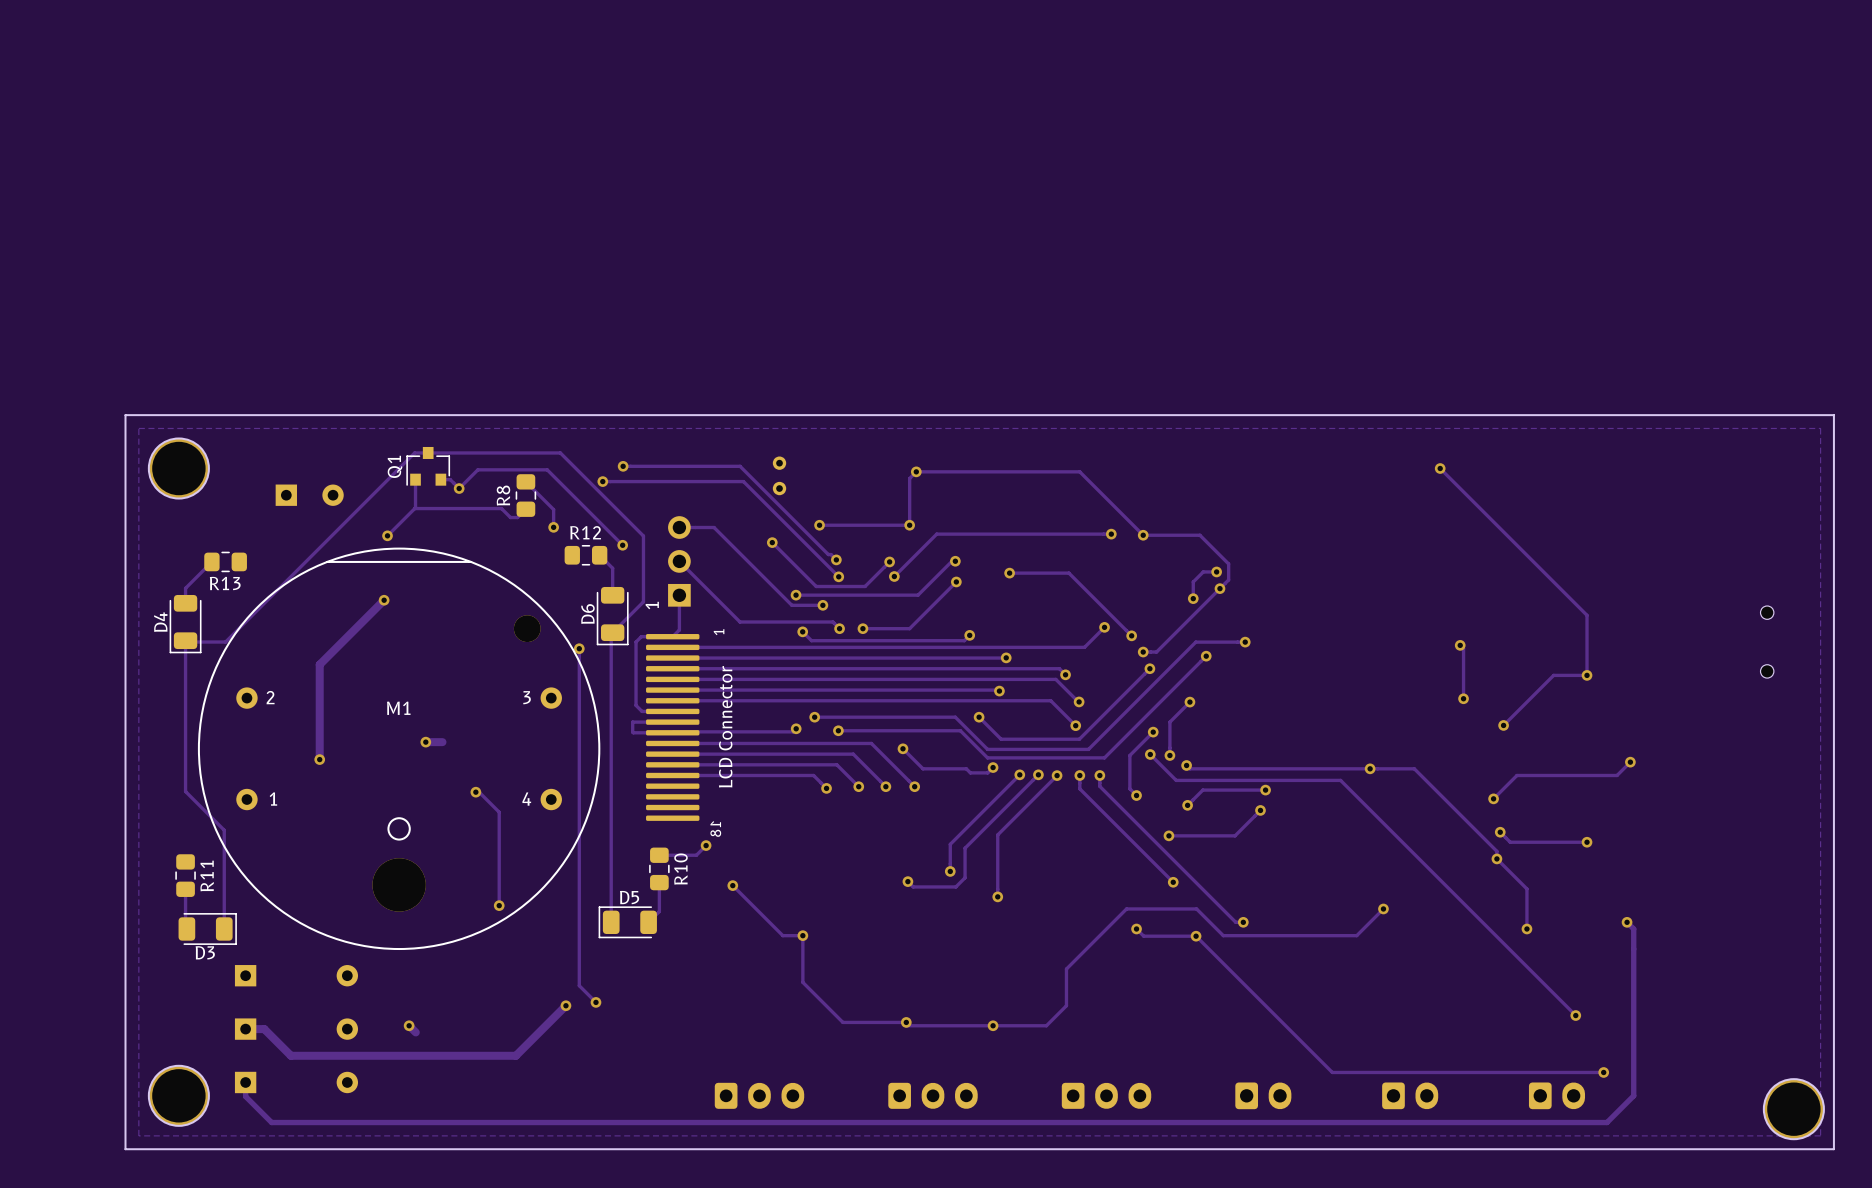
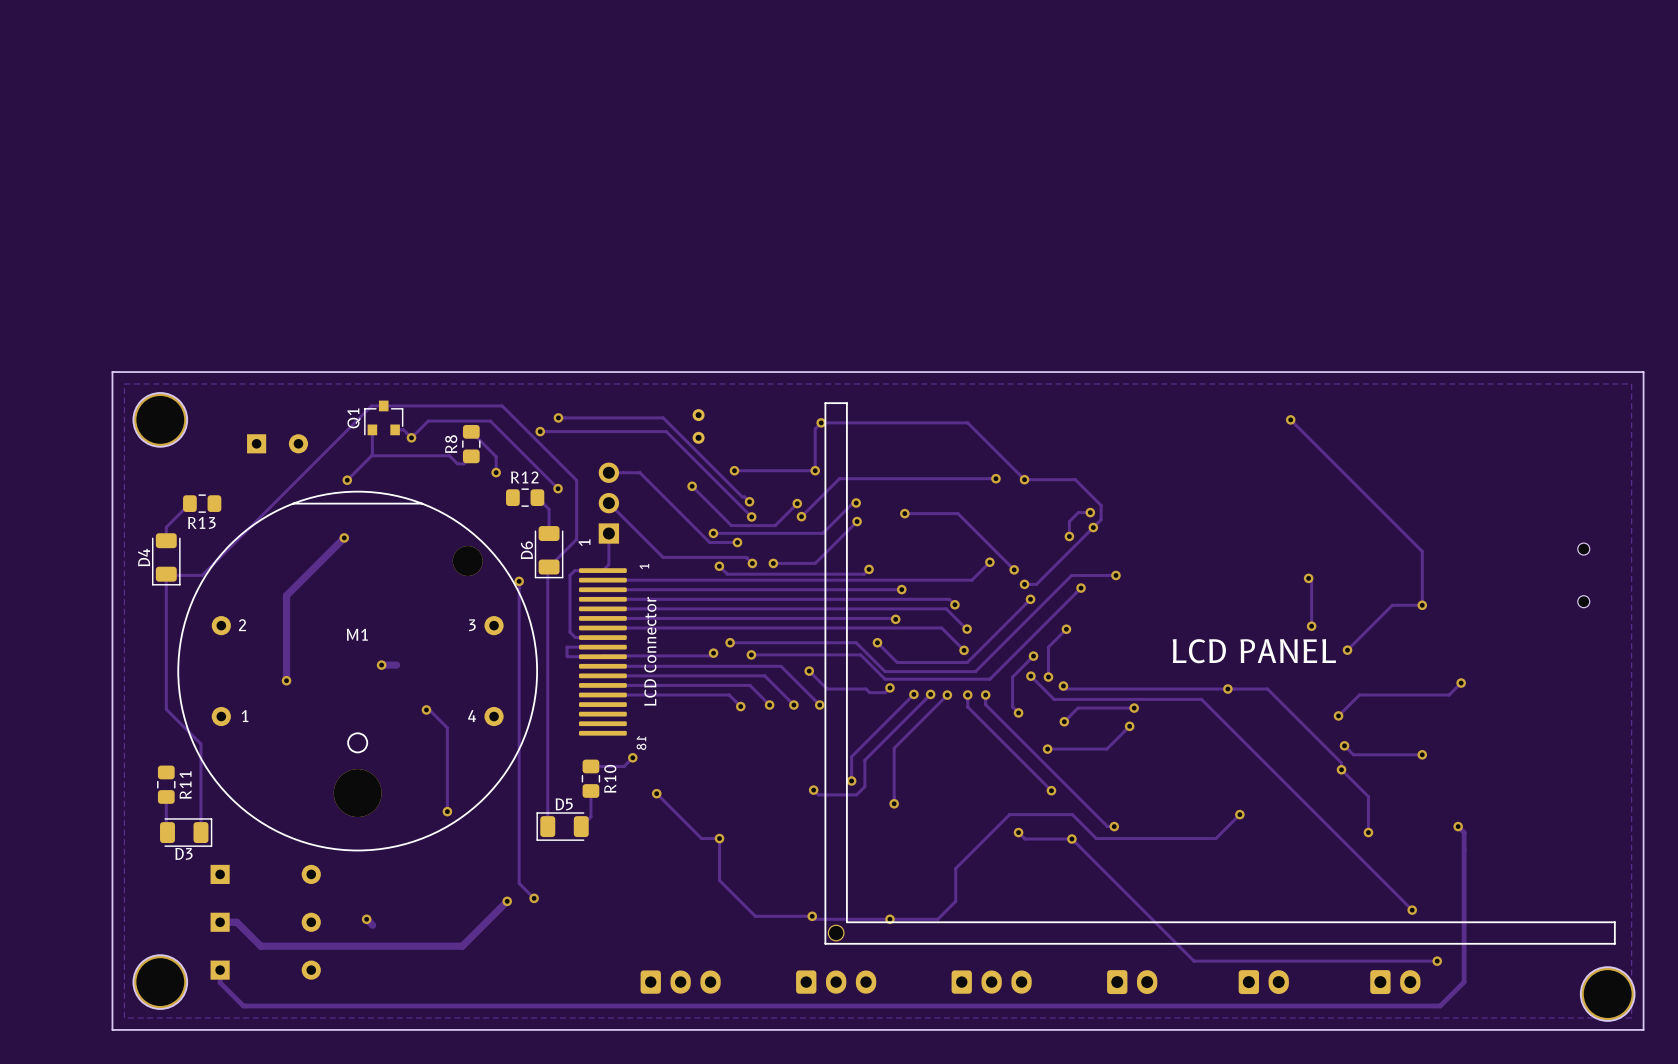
M1 footprint: [197, 547, 601, 951] -> [177, 490, 539, 852]
part: none -> LCD Connector (1097, 673)

